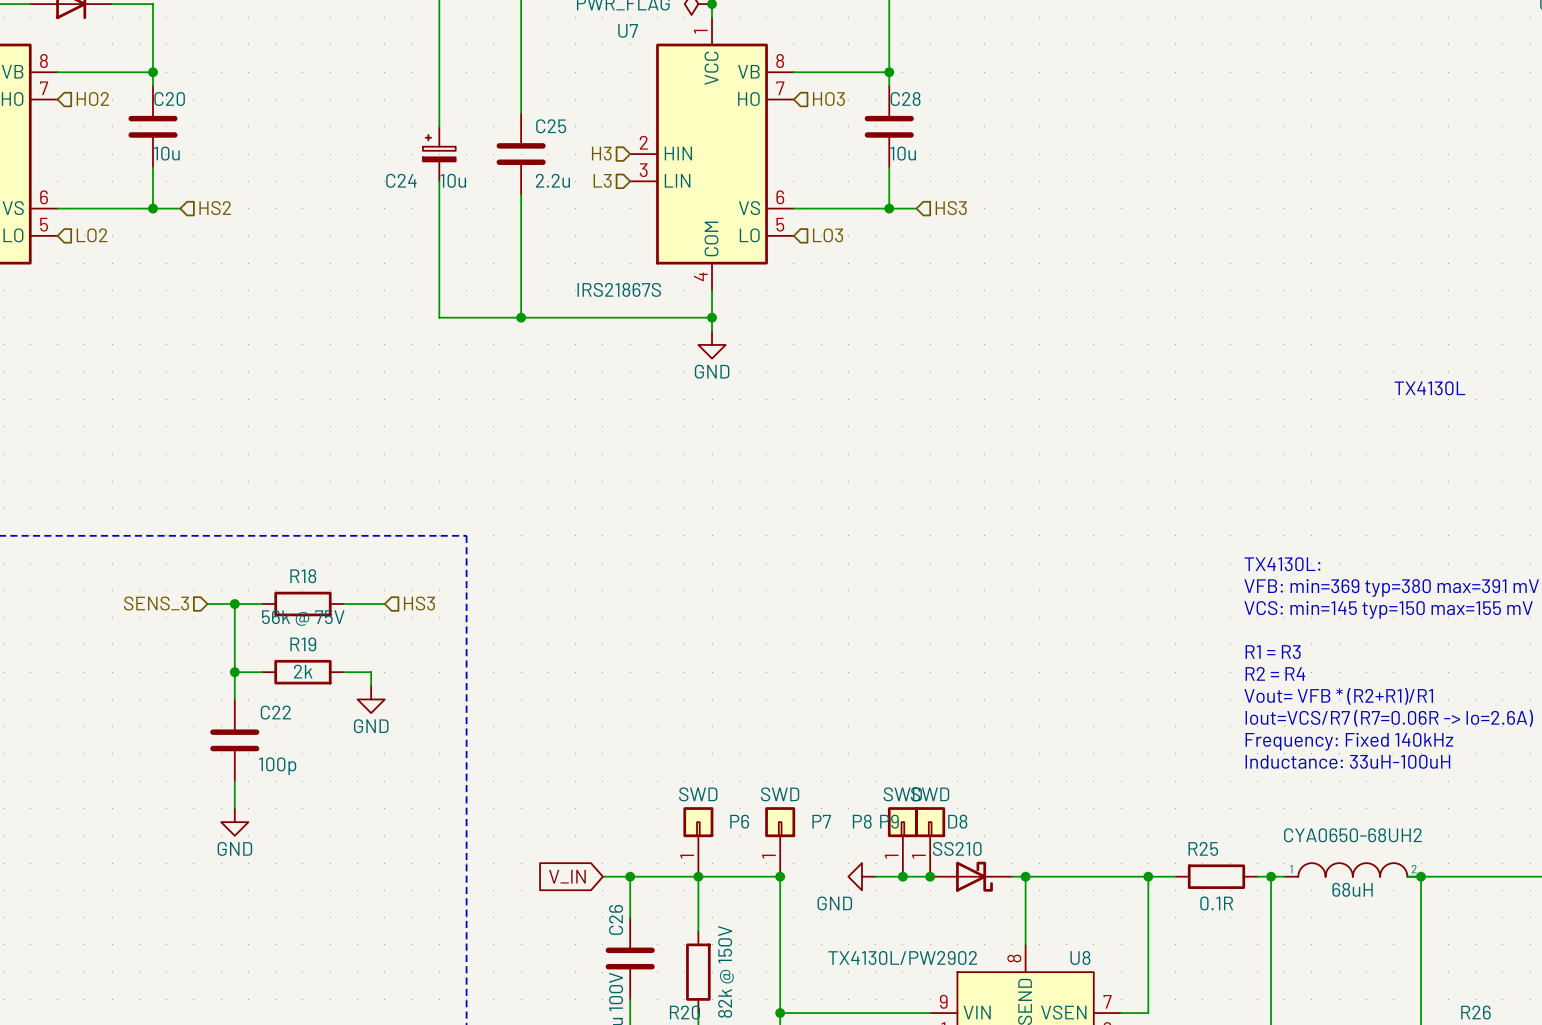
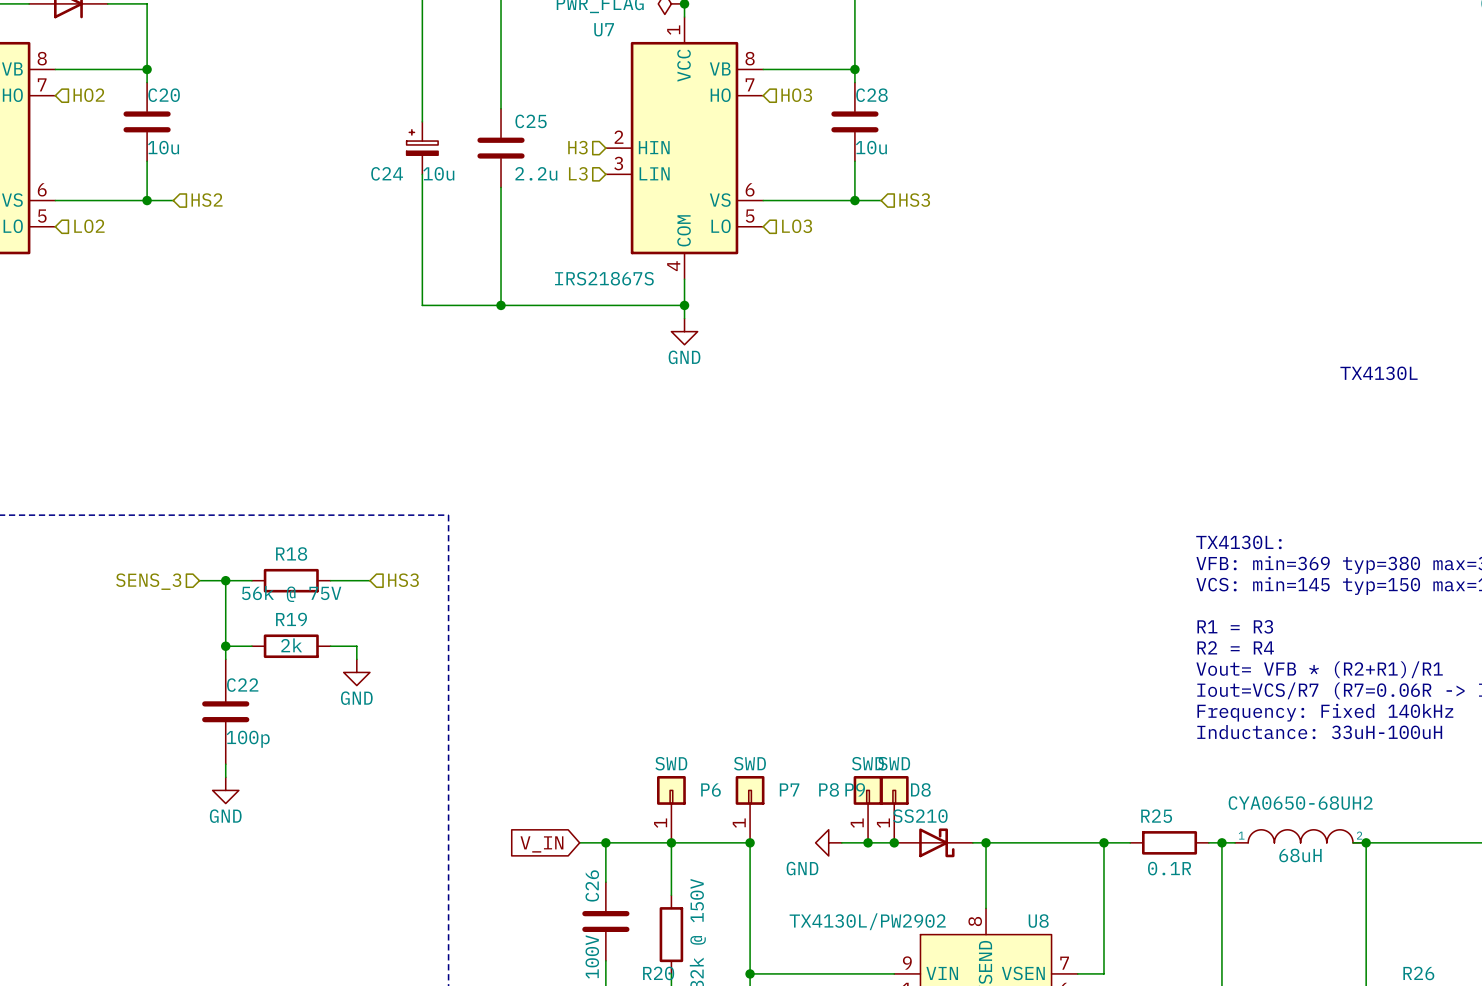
C22 symbol: [210, 699, 260, 782] -> [202, 659, 250, 765]

